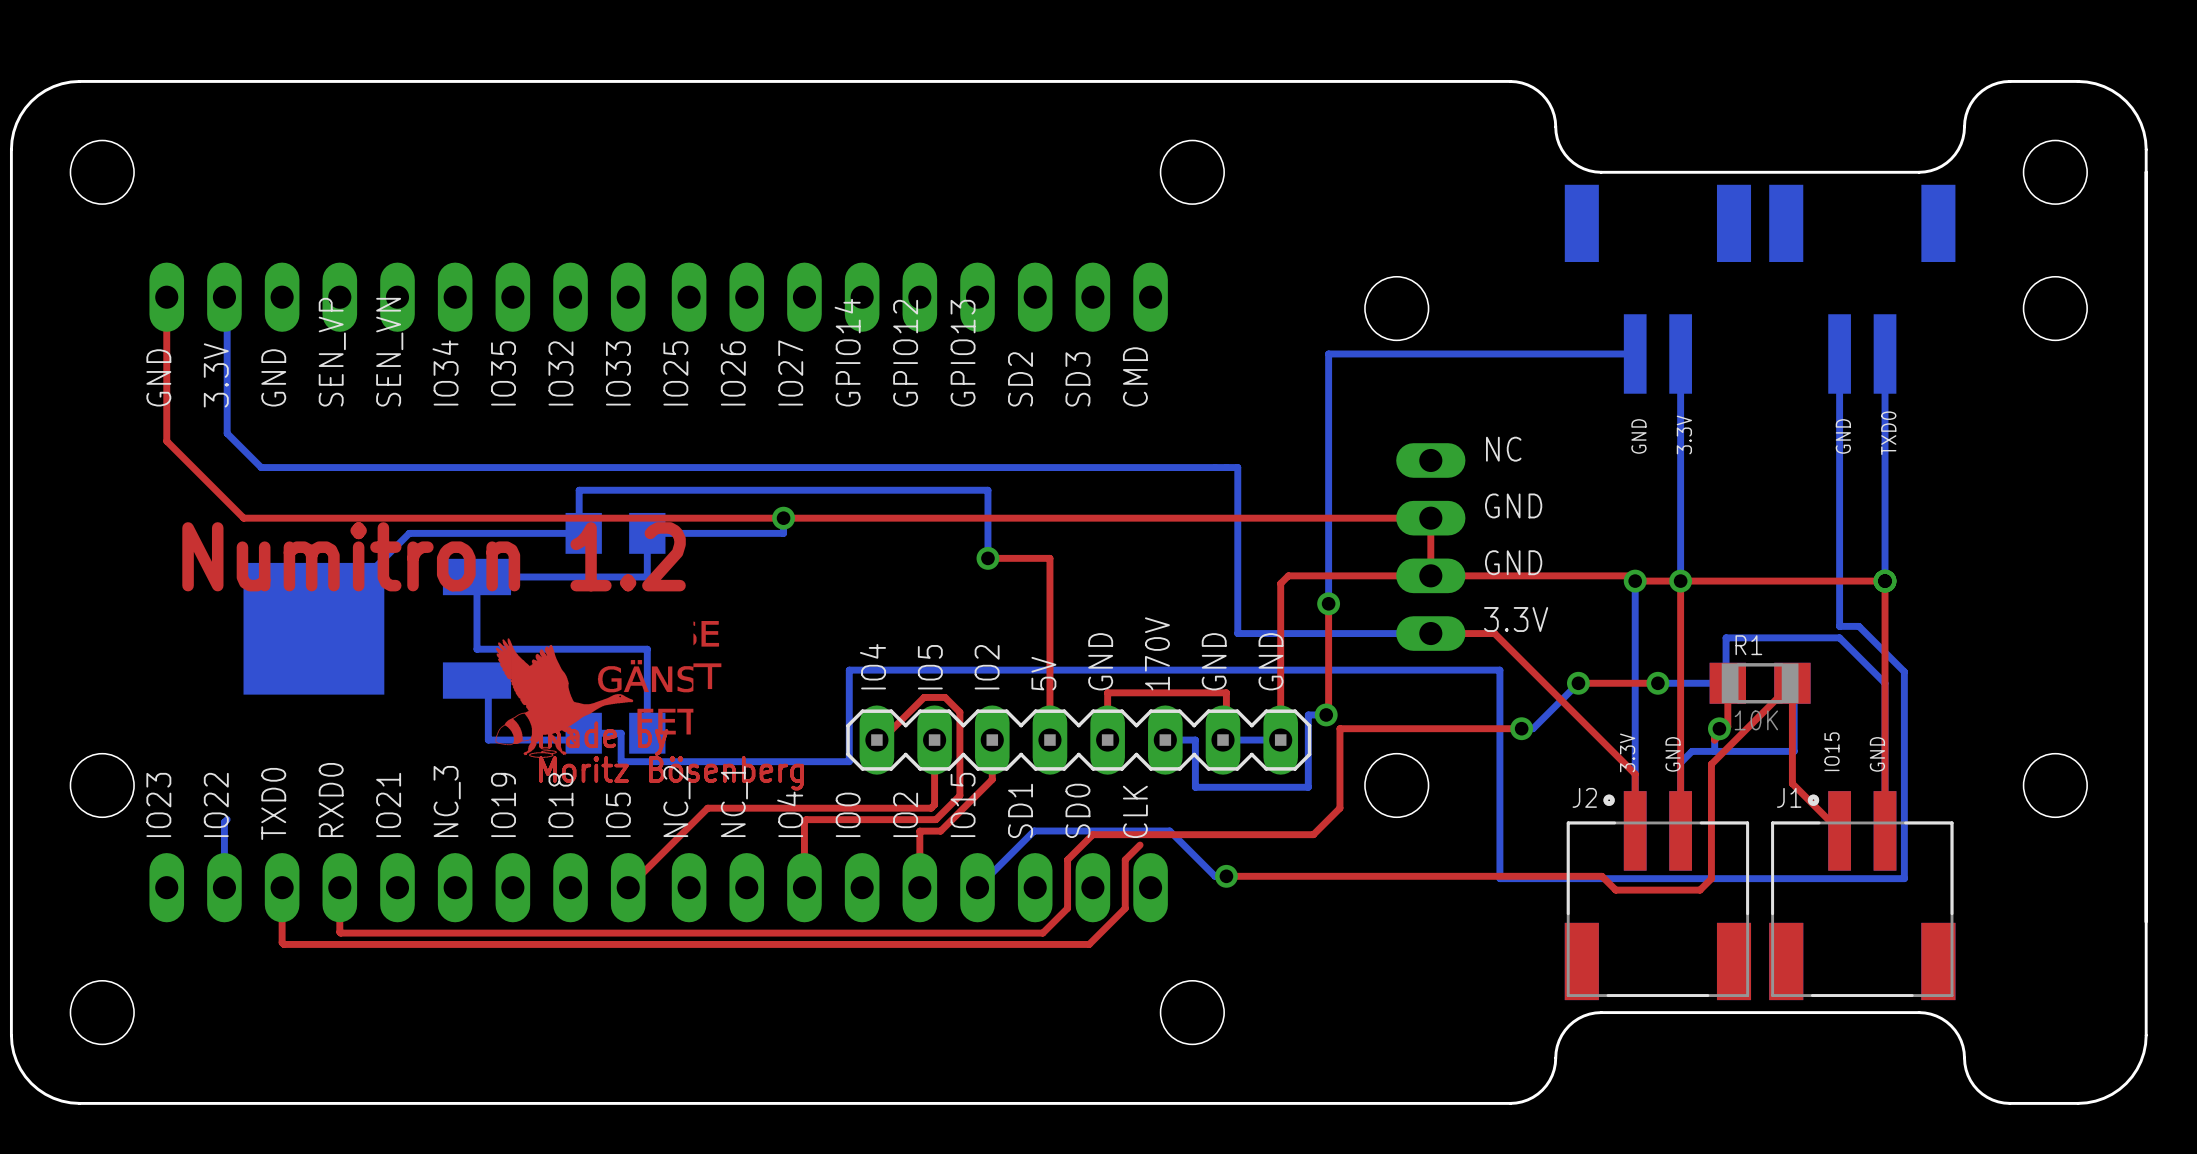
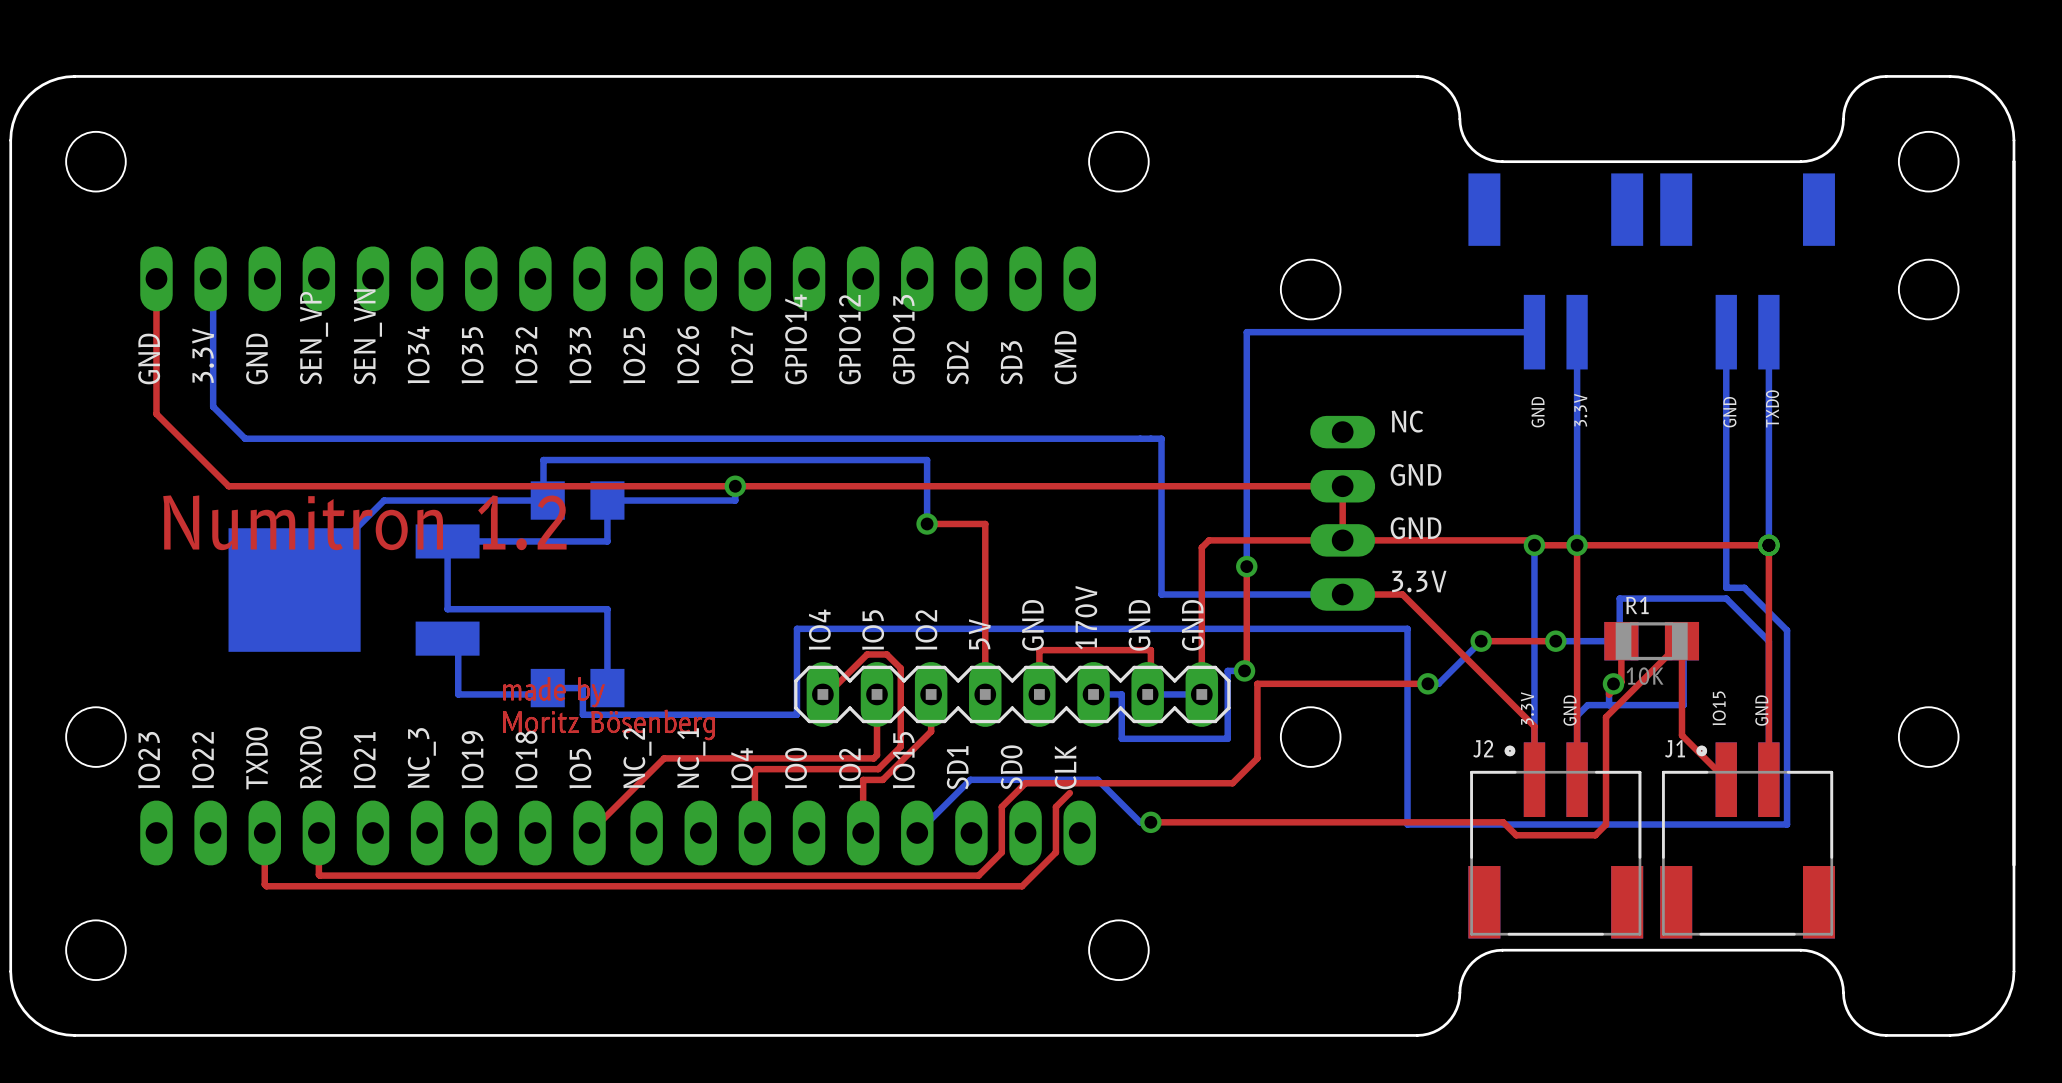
drawing: [495, 621, 722, 758] -> none
bottom track: (227, 819) (224, 822) (224, 887) -> none

